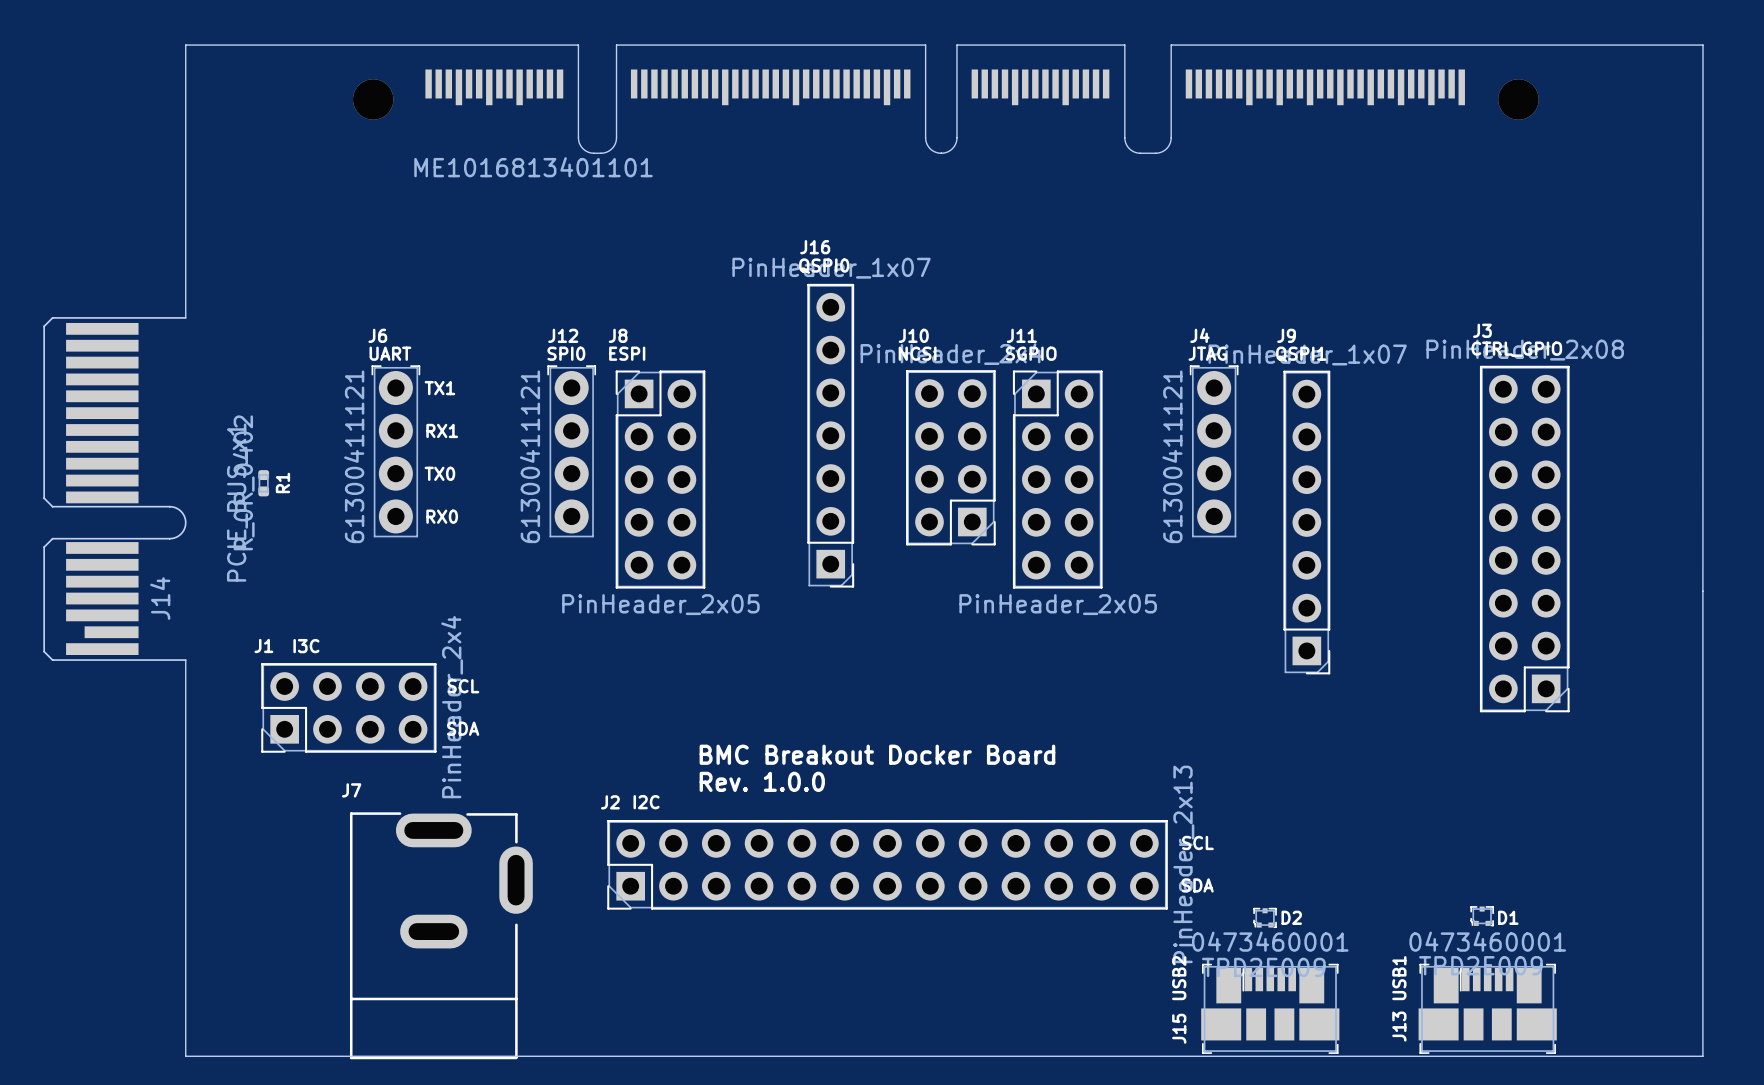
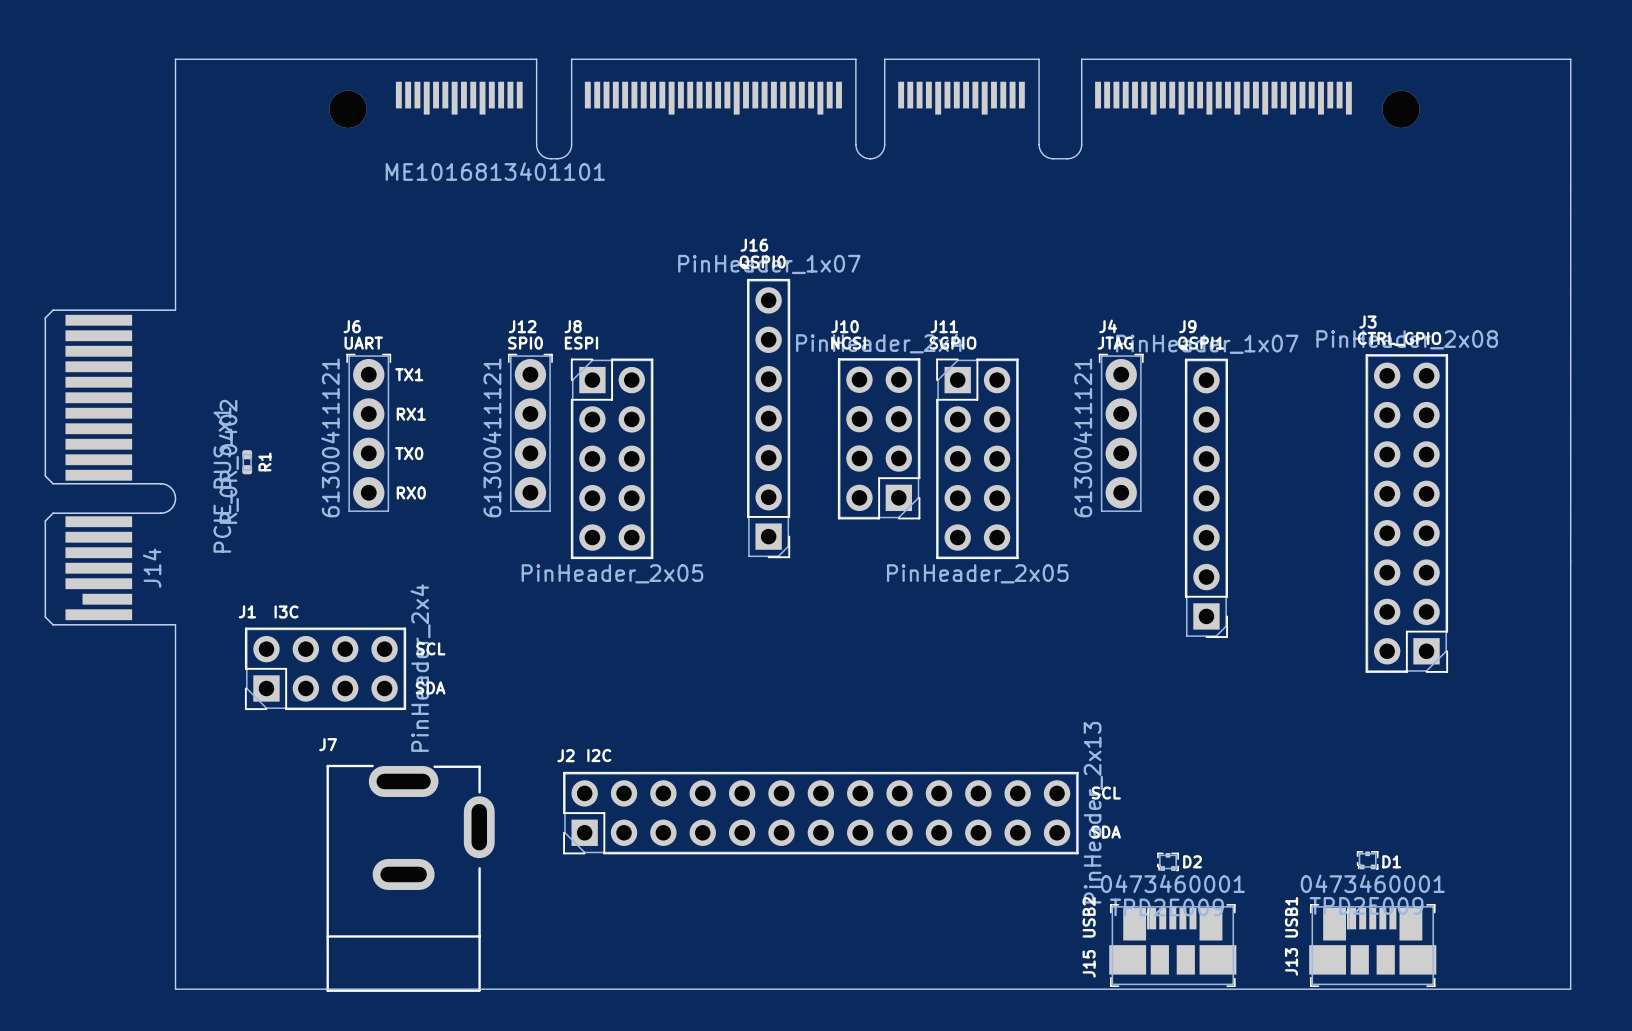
text: BMC Breakout Docker Board (877, 754) -> none
text: Rev. 1.0.0 (762, 781) -> none

